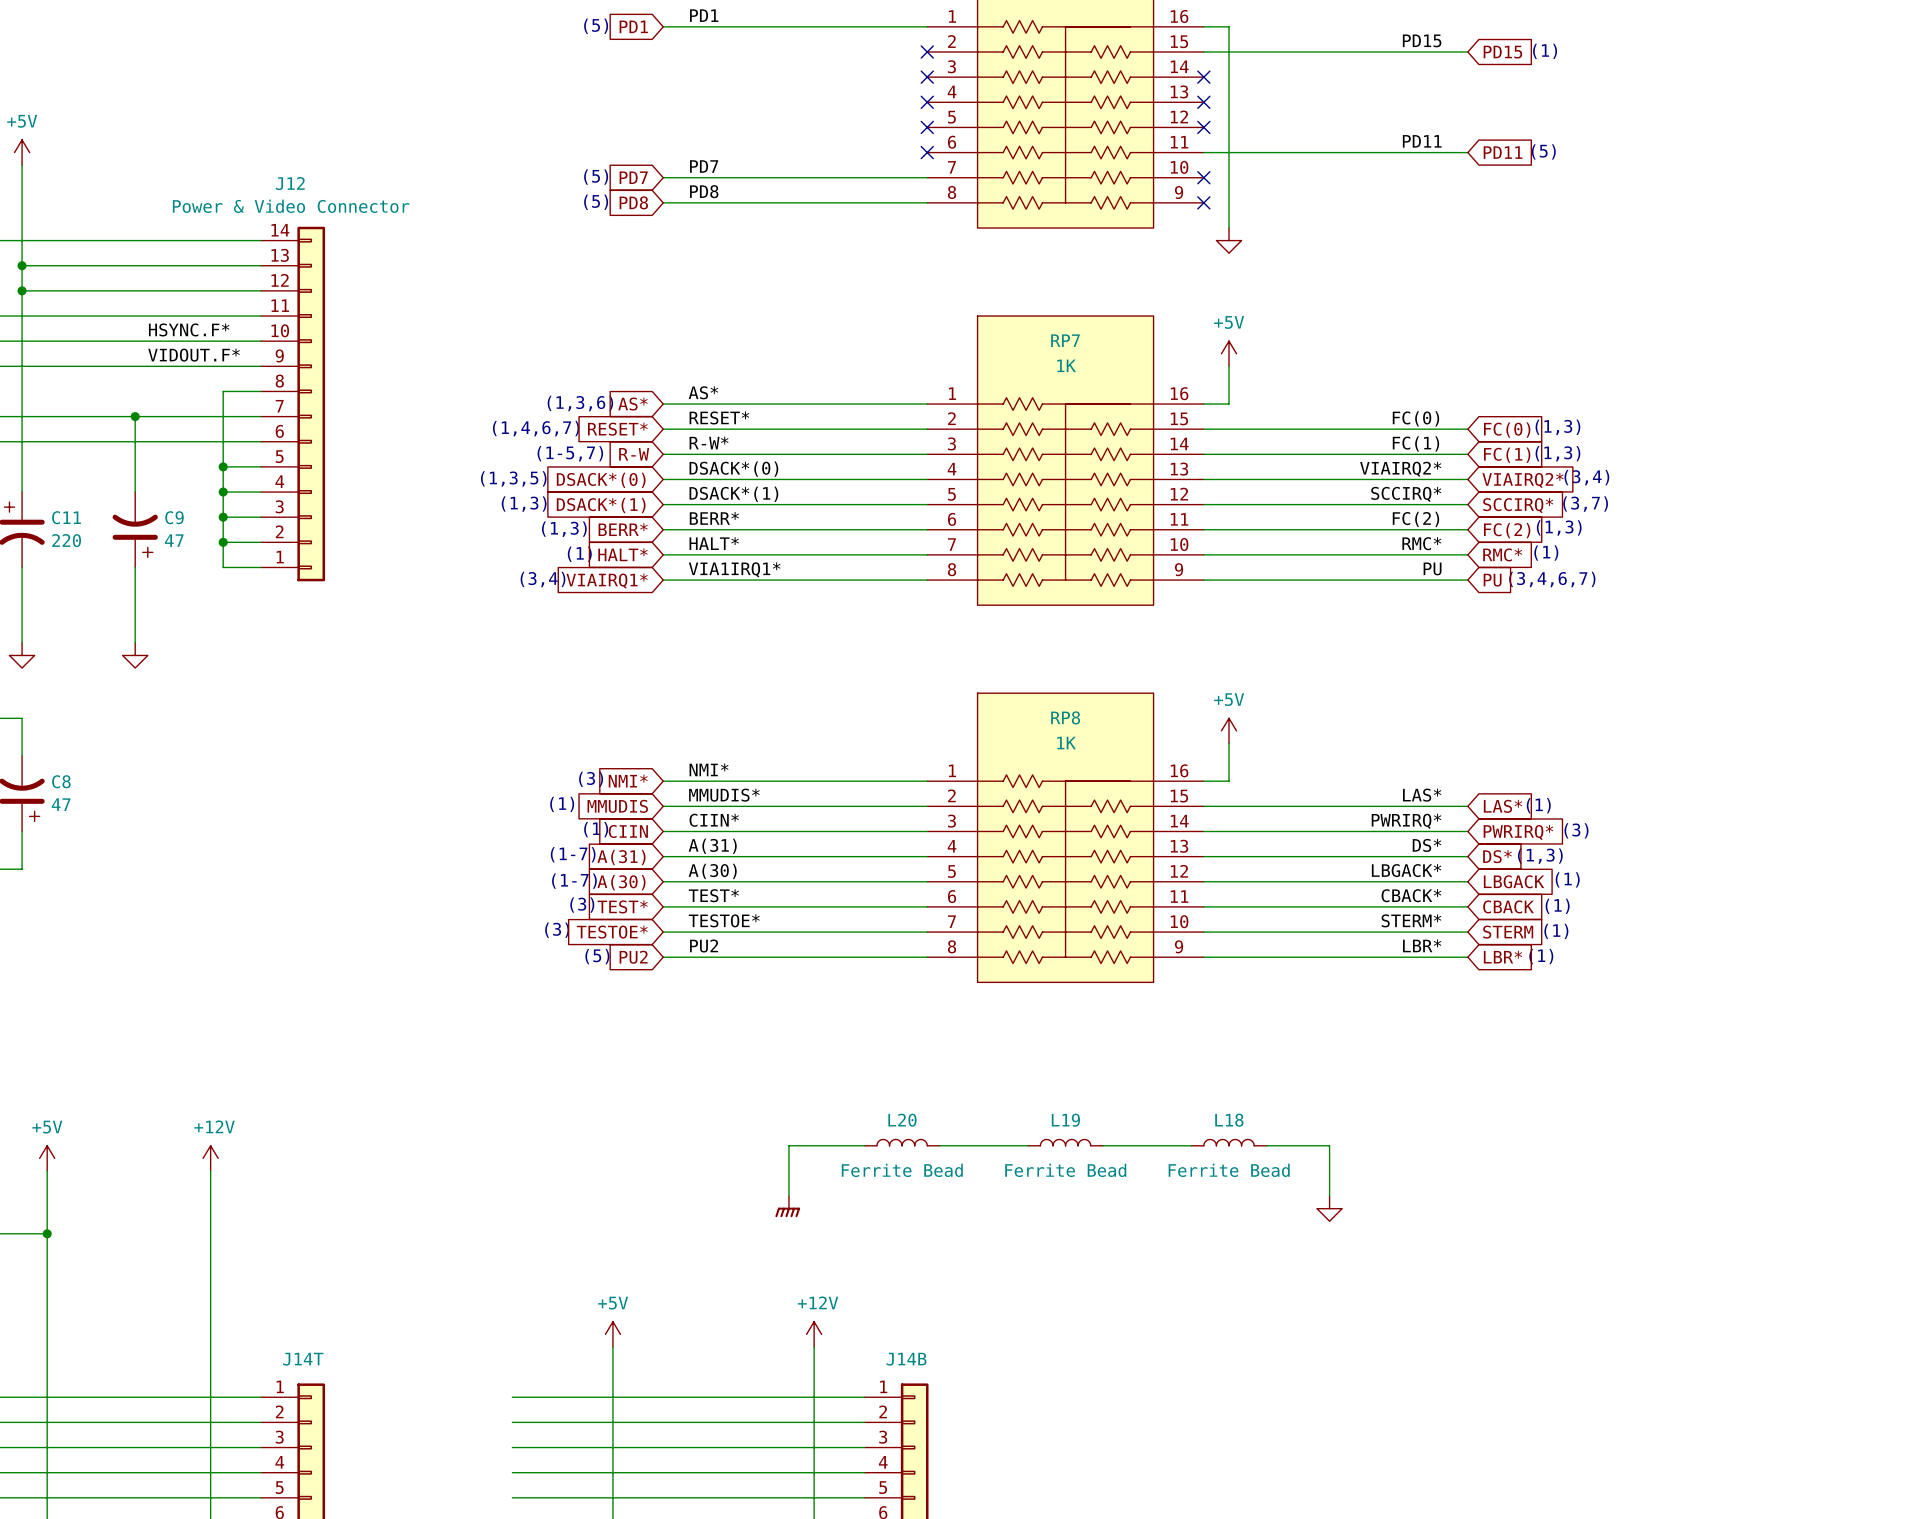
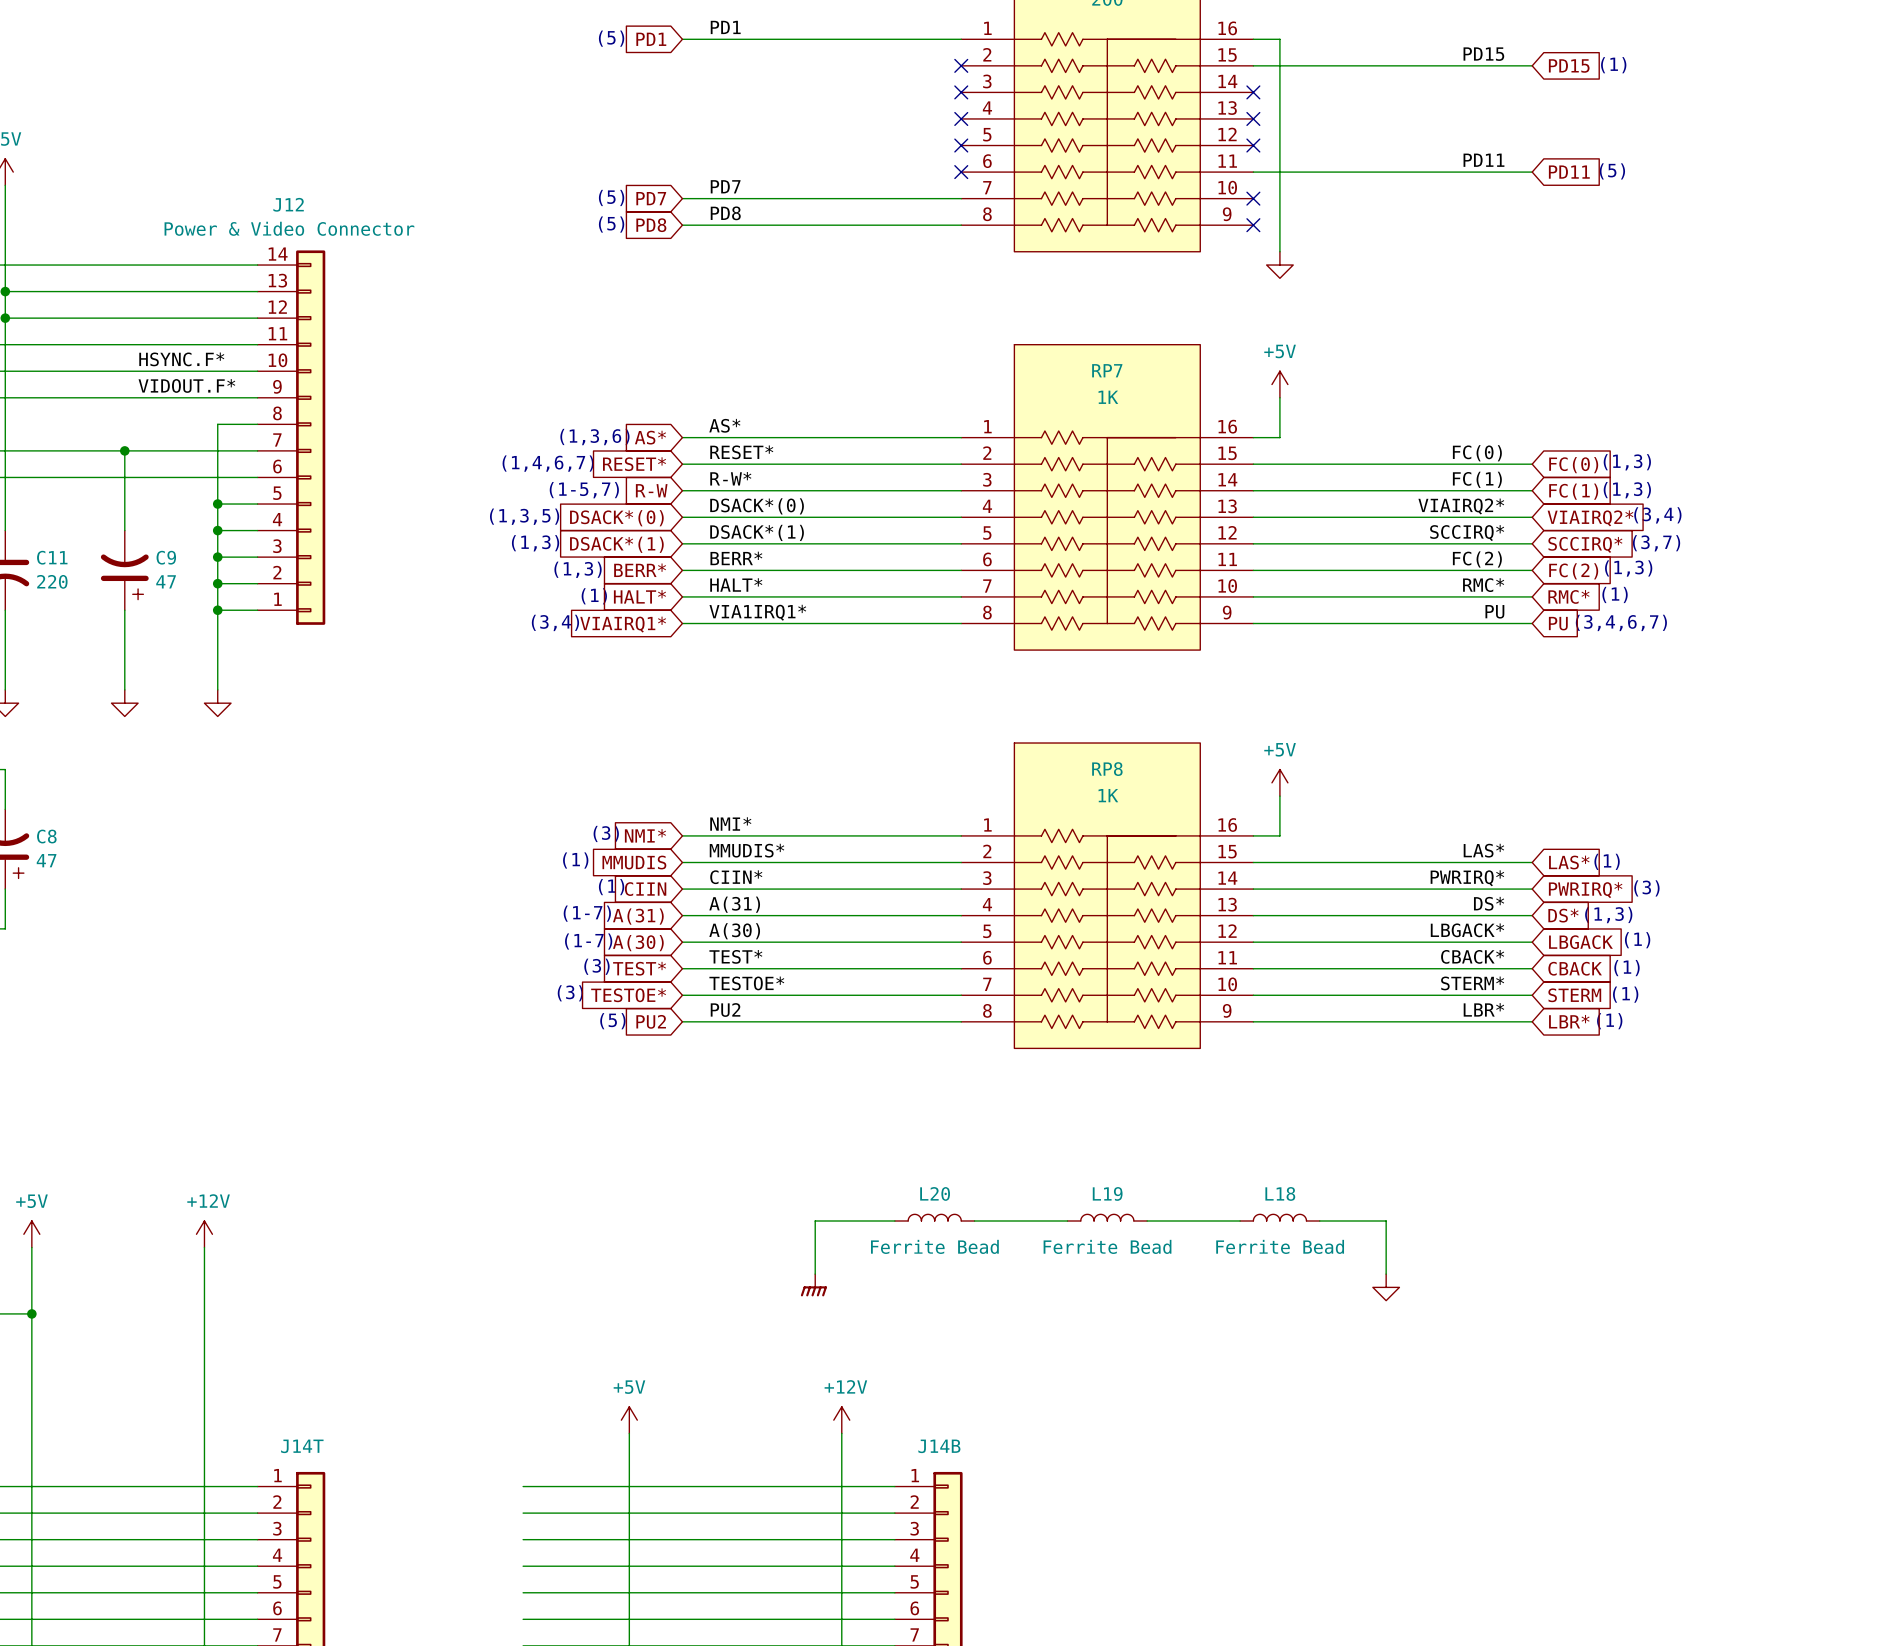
wire: none -> (217, 610) (217, 689)
junction: none -> (217, 610)
power symbol: none -> (217, 703)

